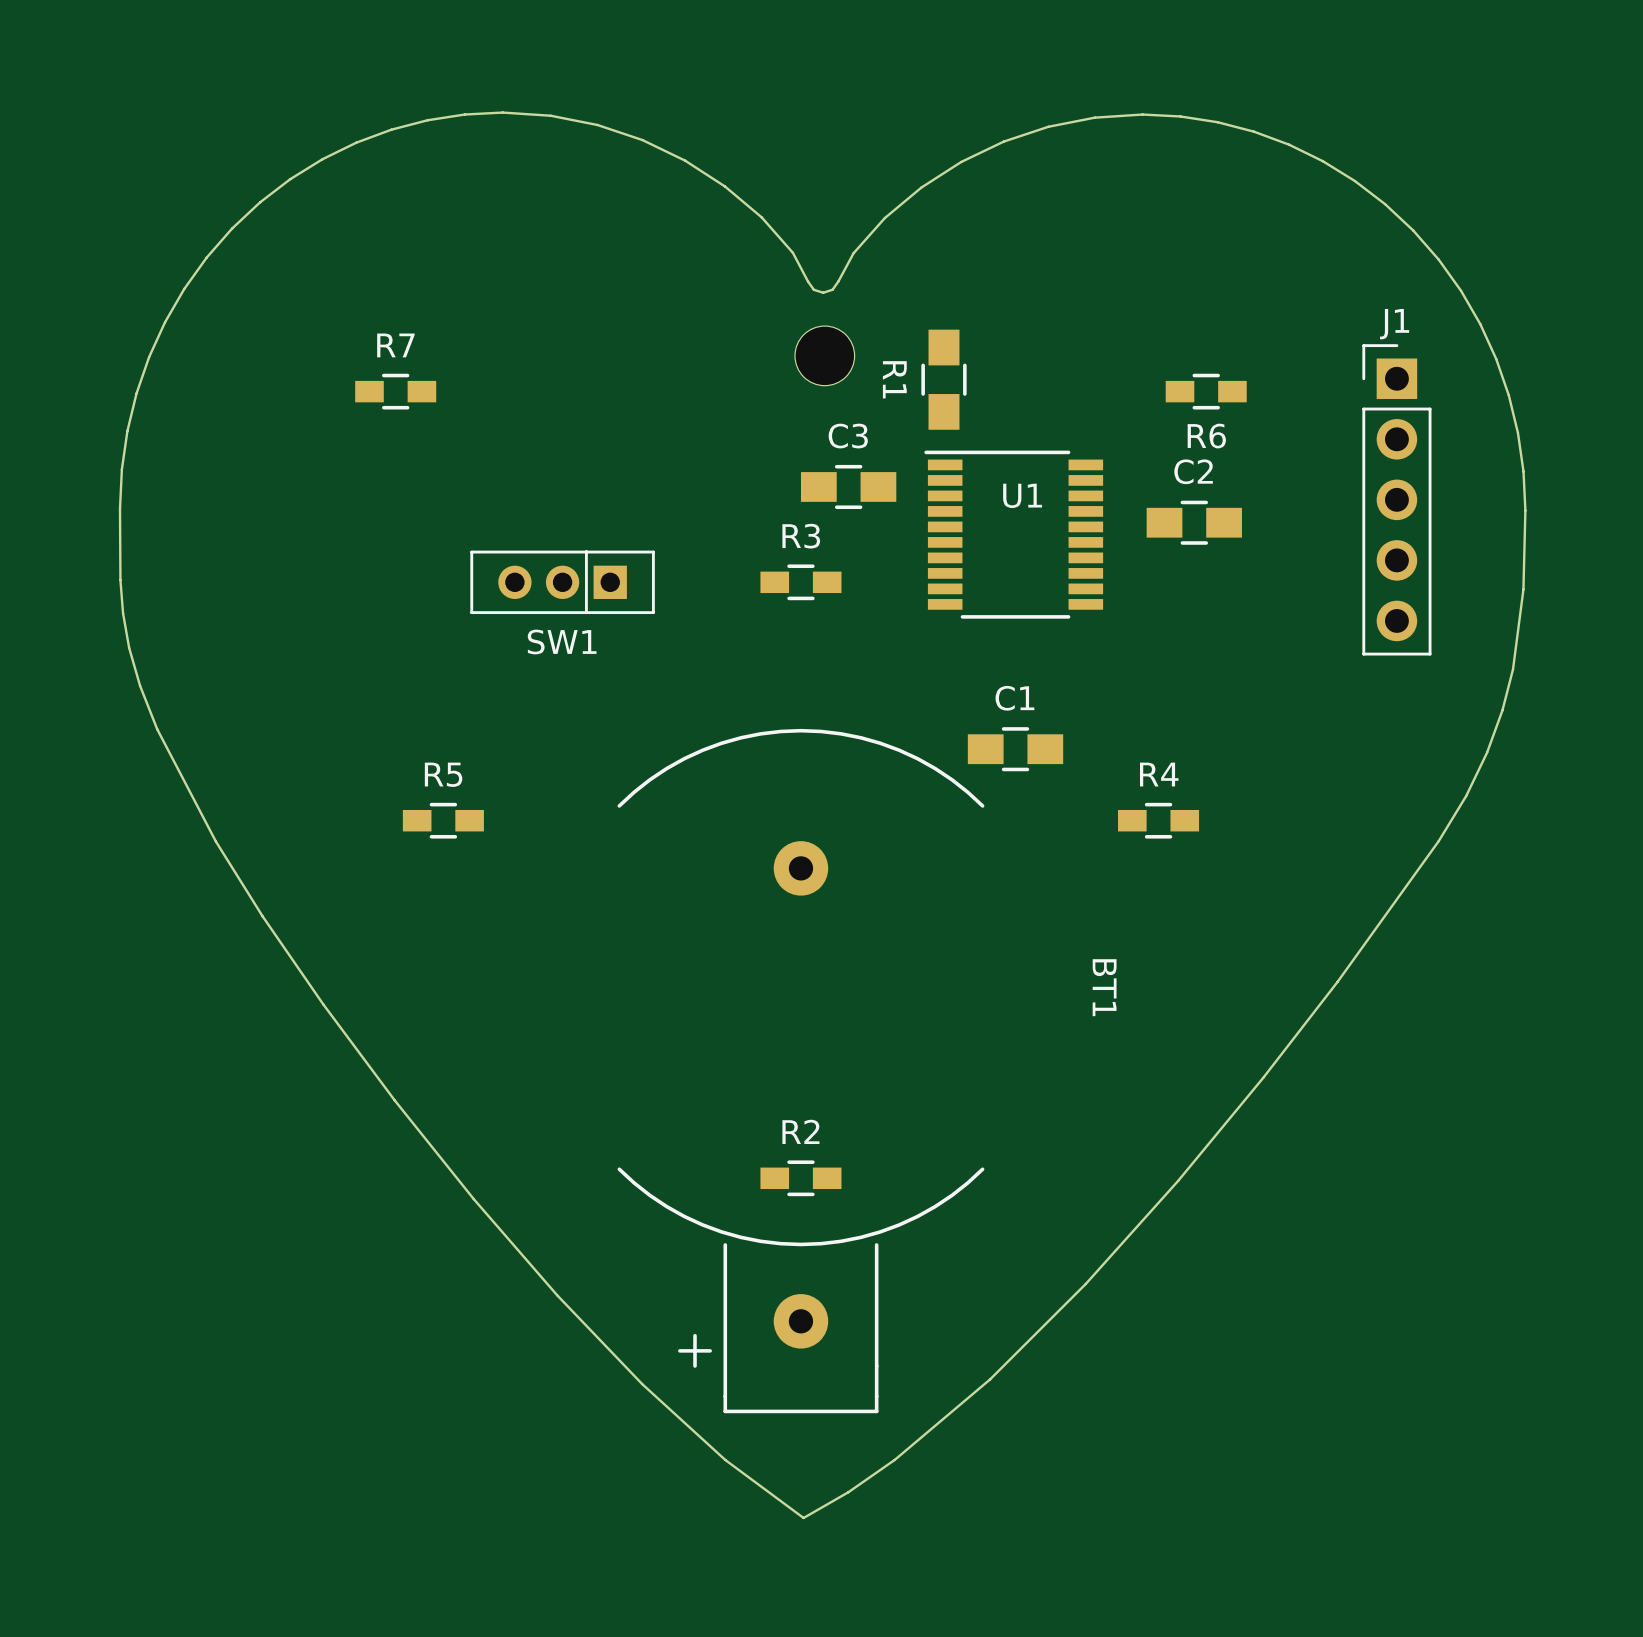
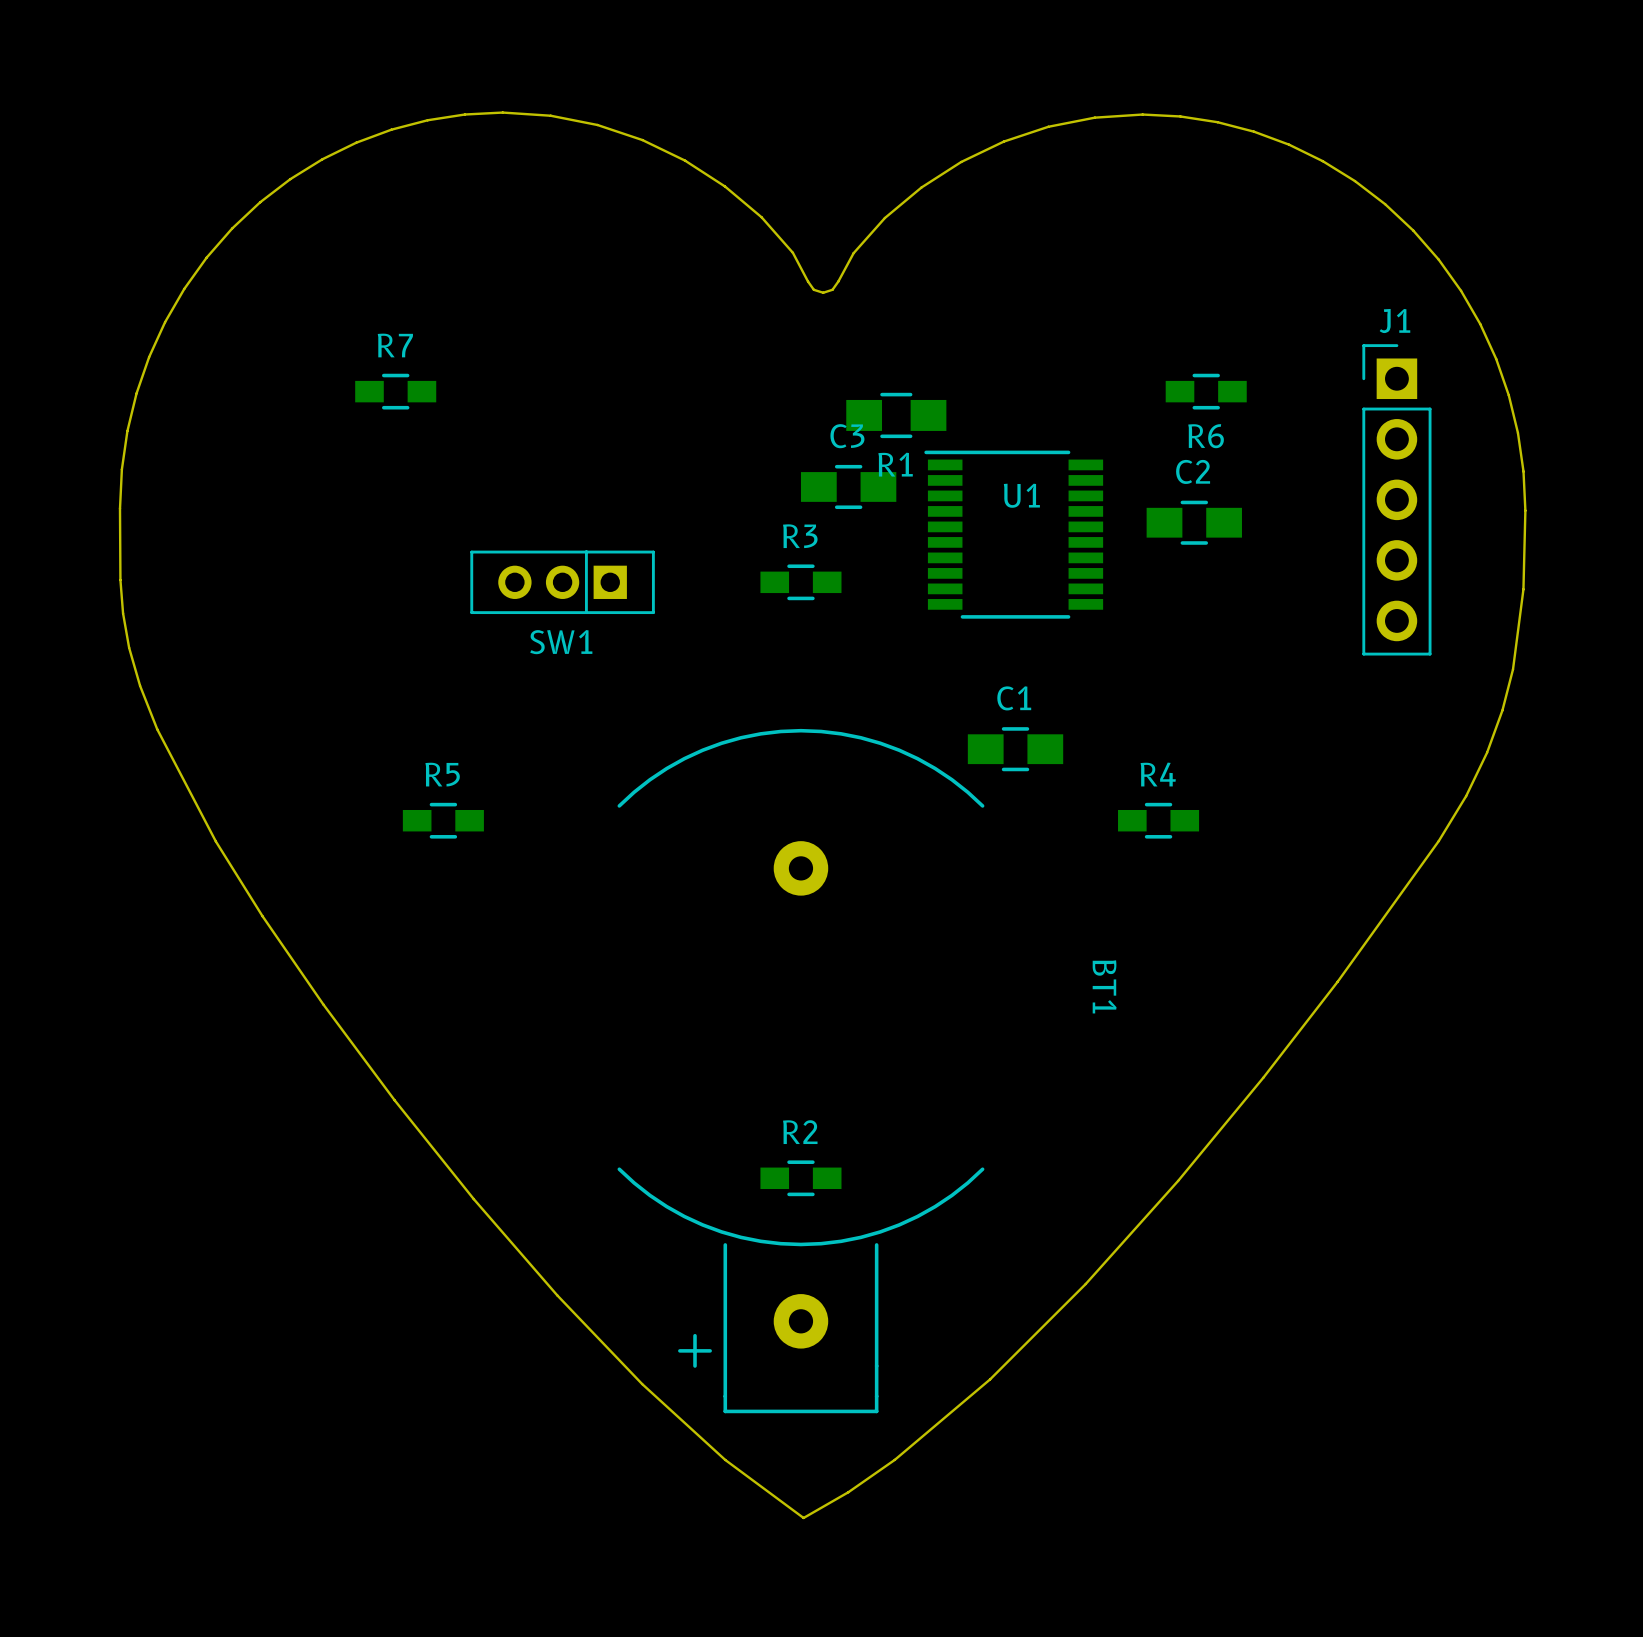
part: (824, 355) -> none
R1 name position: R1 (894, 379) -> R1 (895, 464)
R1 rotation: 0° (943, 379) -> 90° clockwise (896, 415)

